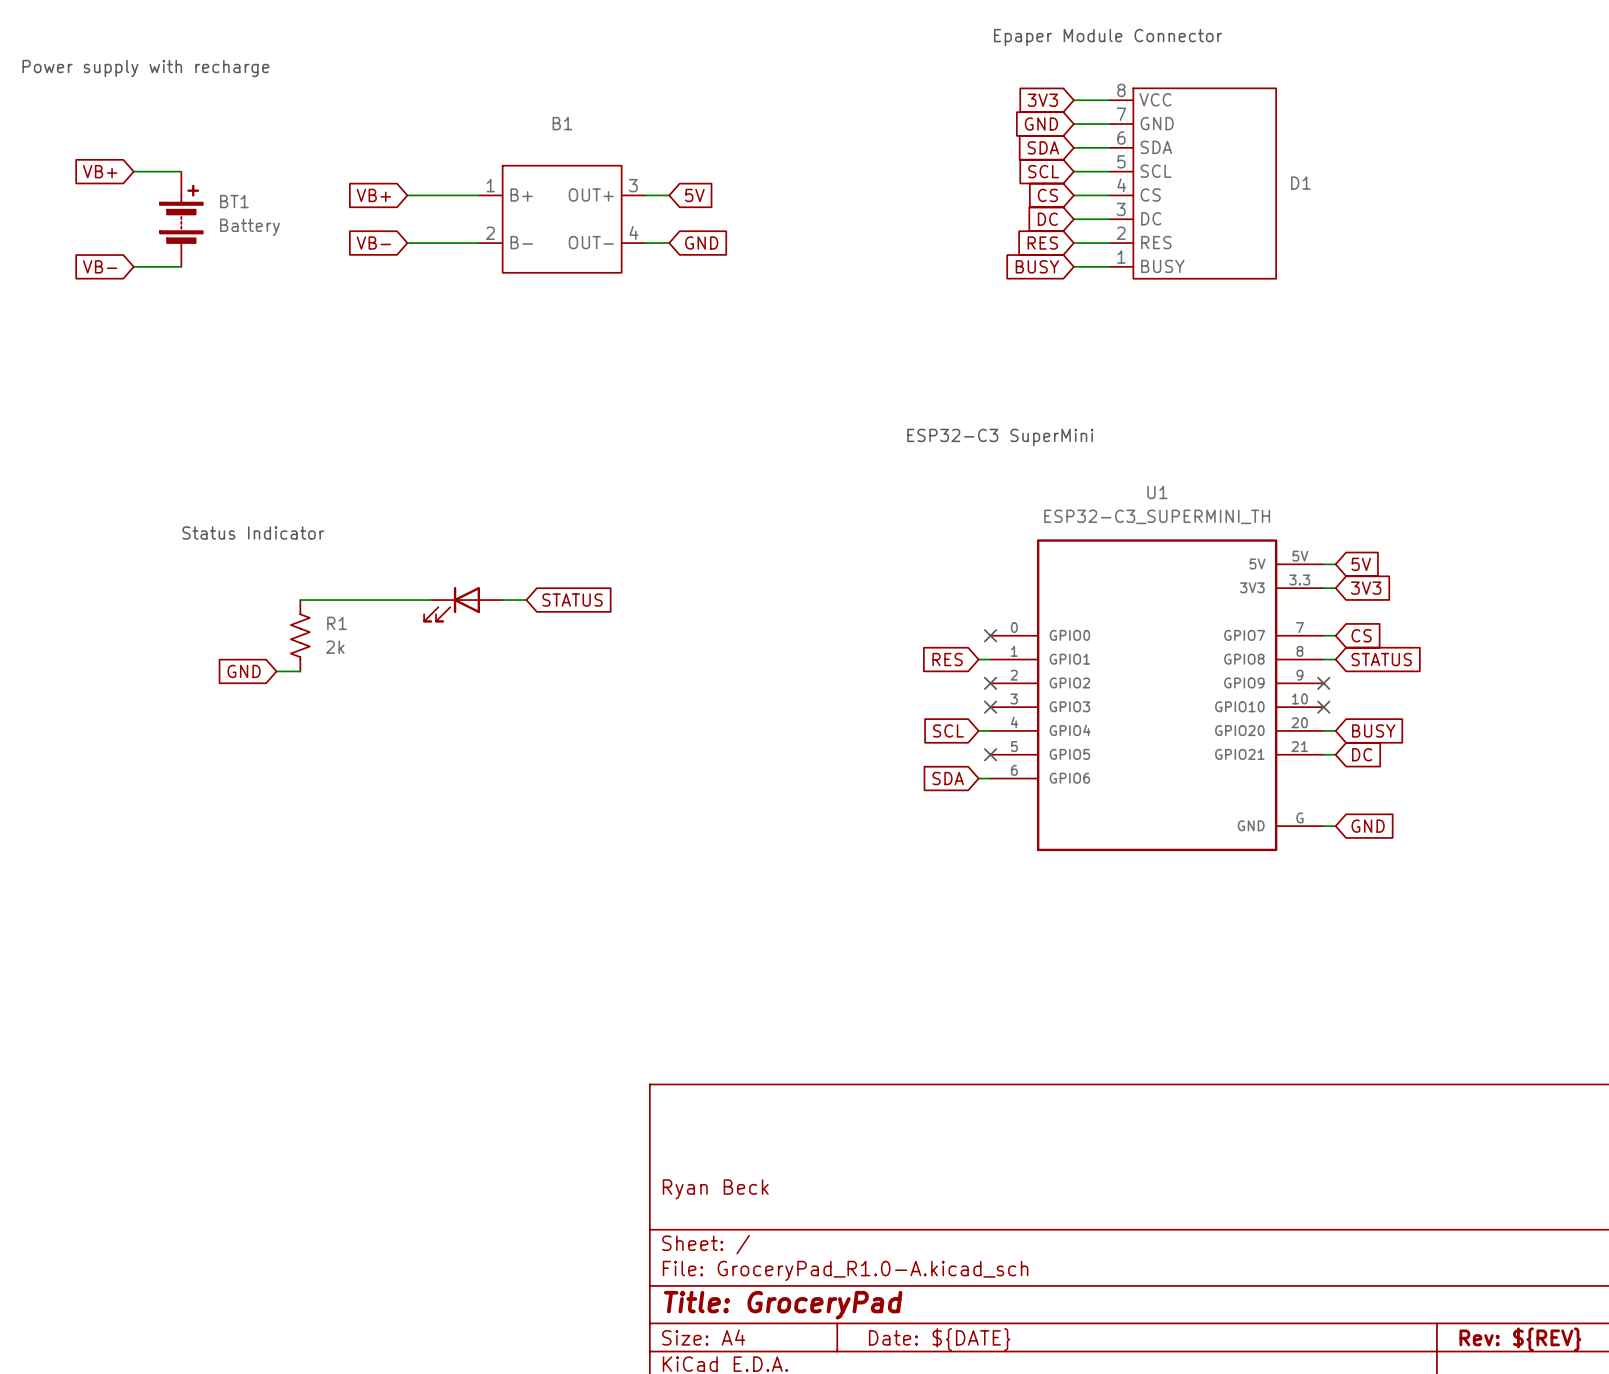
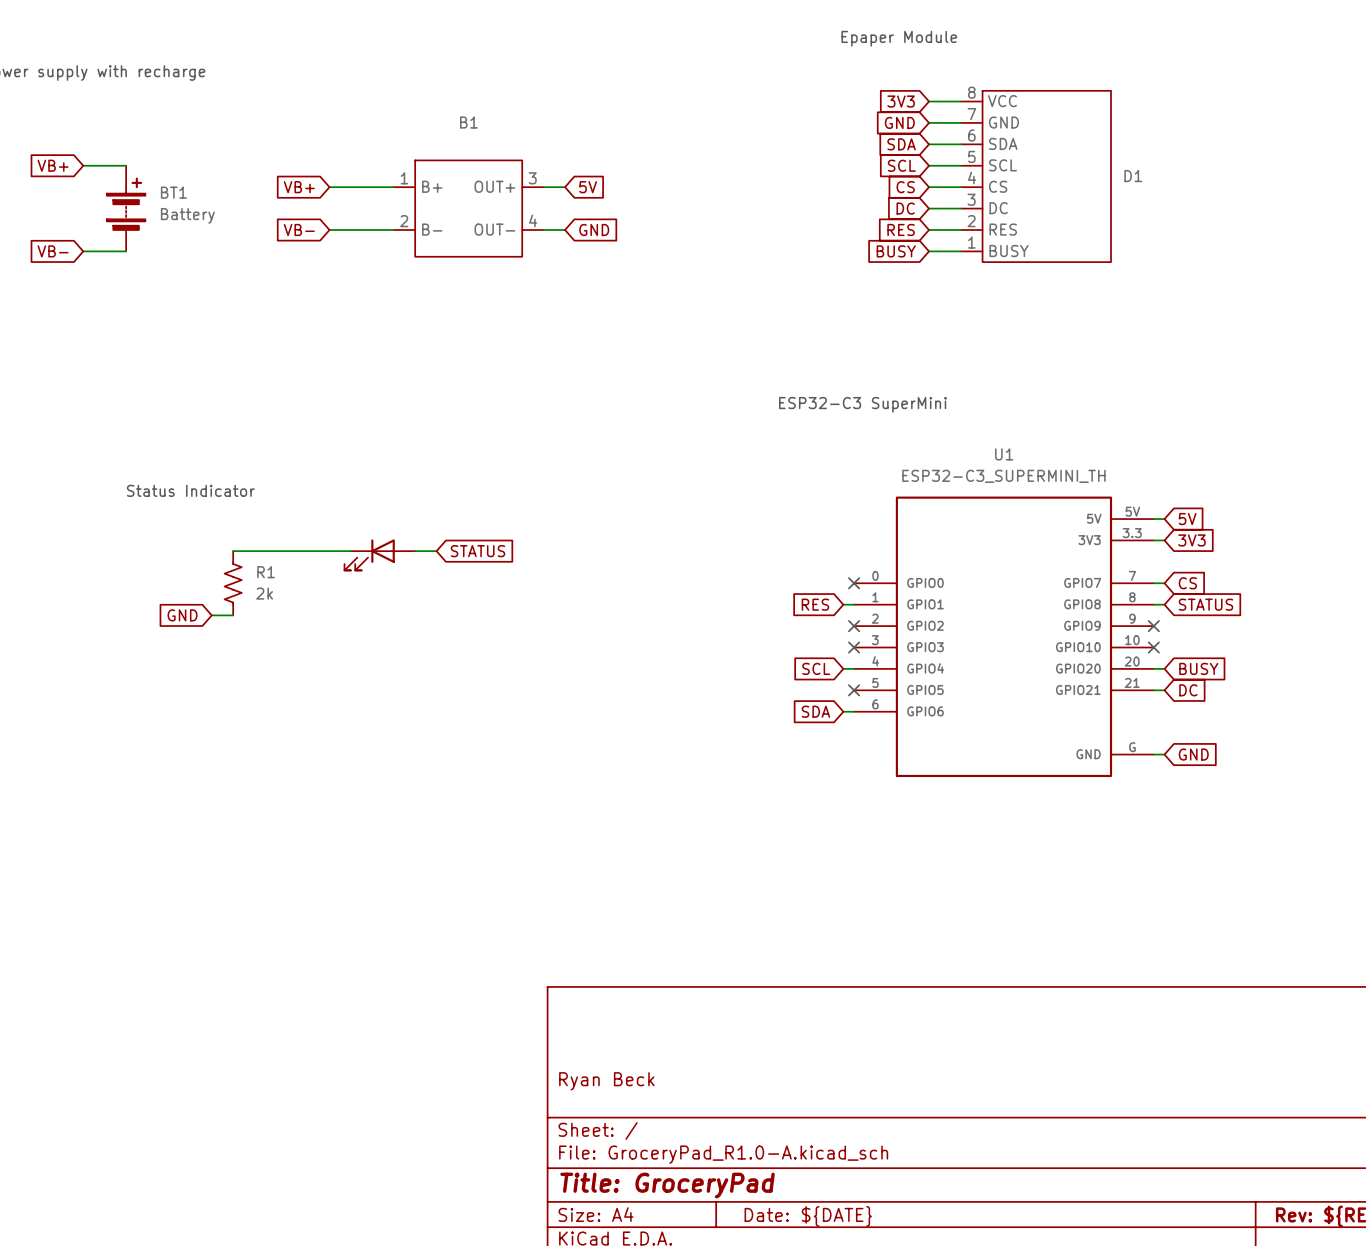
text: Epaper Module Connector (1108, 37) -> Epaper Module (899, 38)

